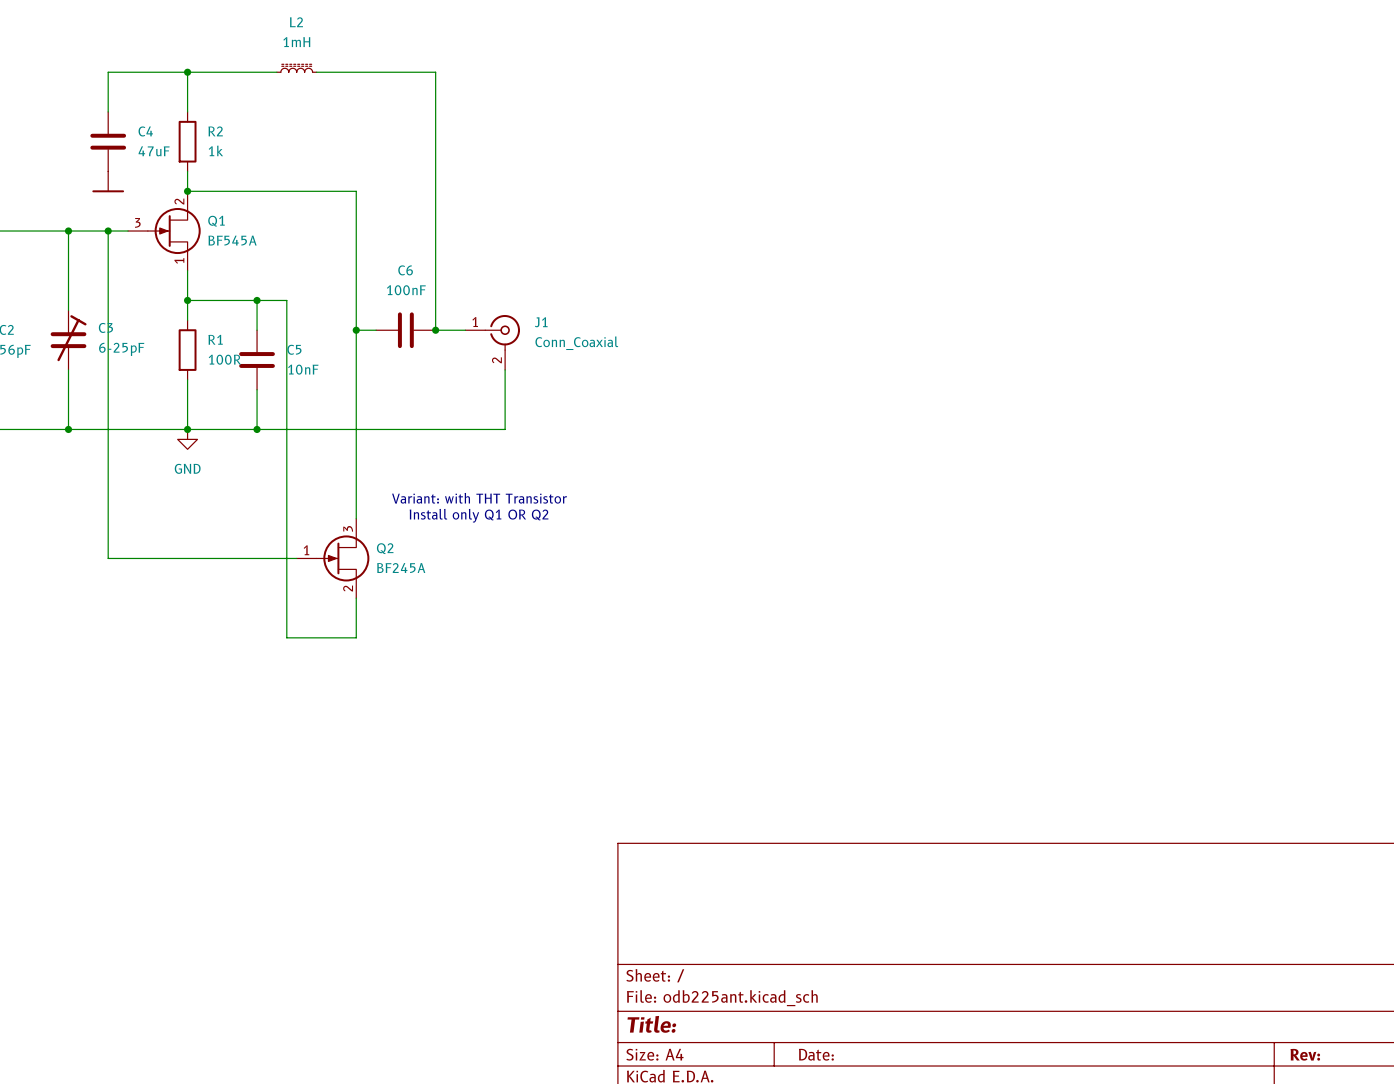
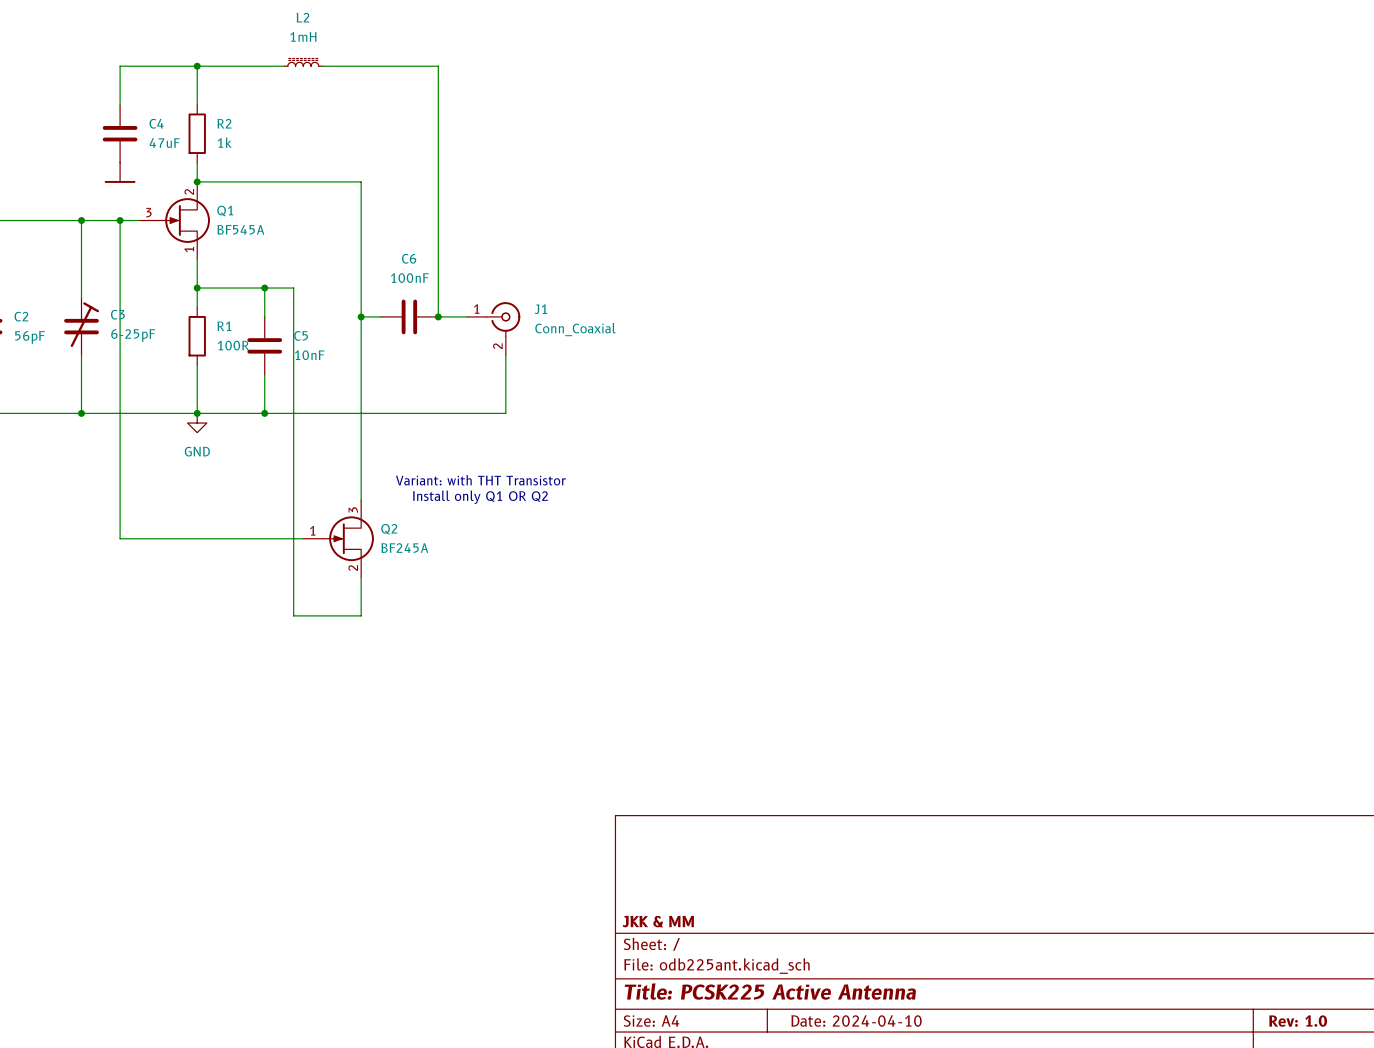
title block: none -> JKK & MM (658, 921)
title block: Title: (651, 1024) -> Title: PCSK225 Active Antenna (770, 991)
title block: Date: (816, 1054) -> Date: 2024-04-10 (856, 1021)
title block: Rev: (1305, 1054) -> Rev: 1.0 (1298, 1021)

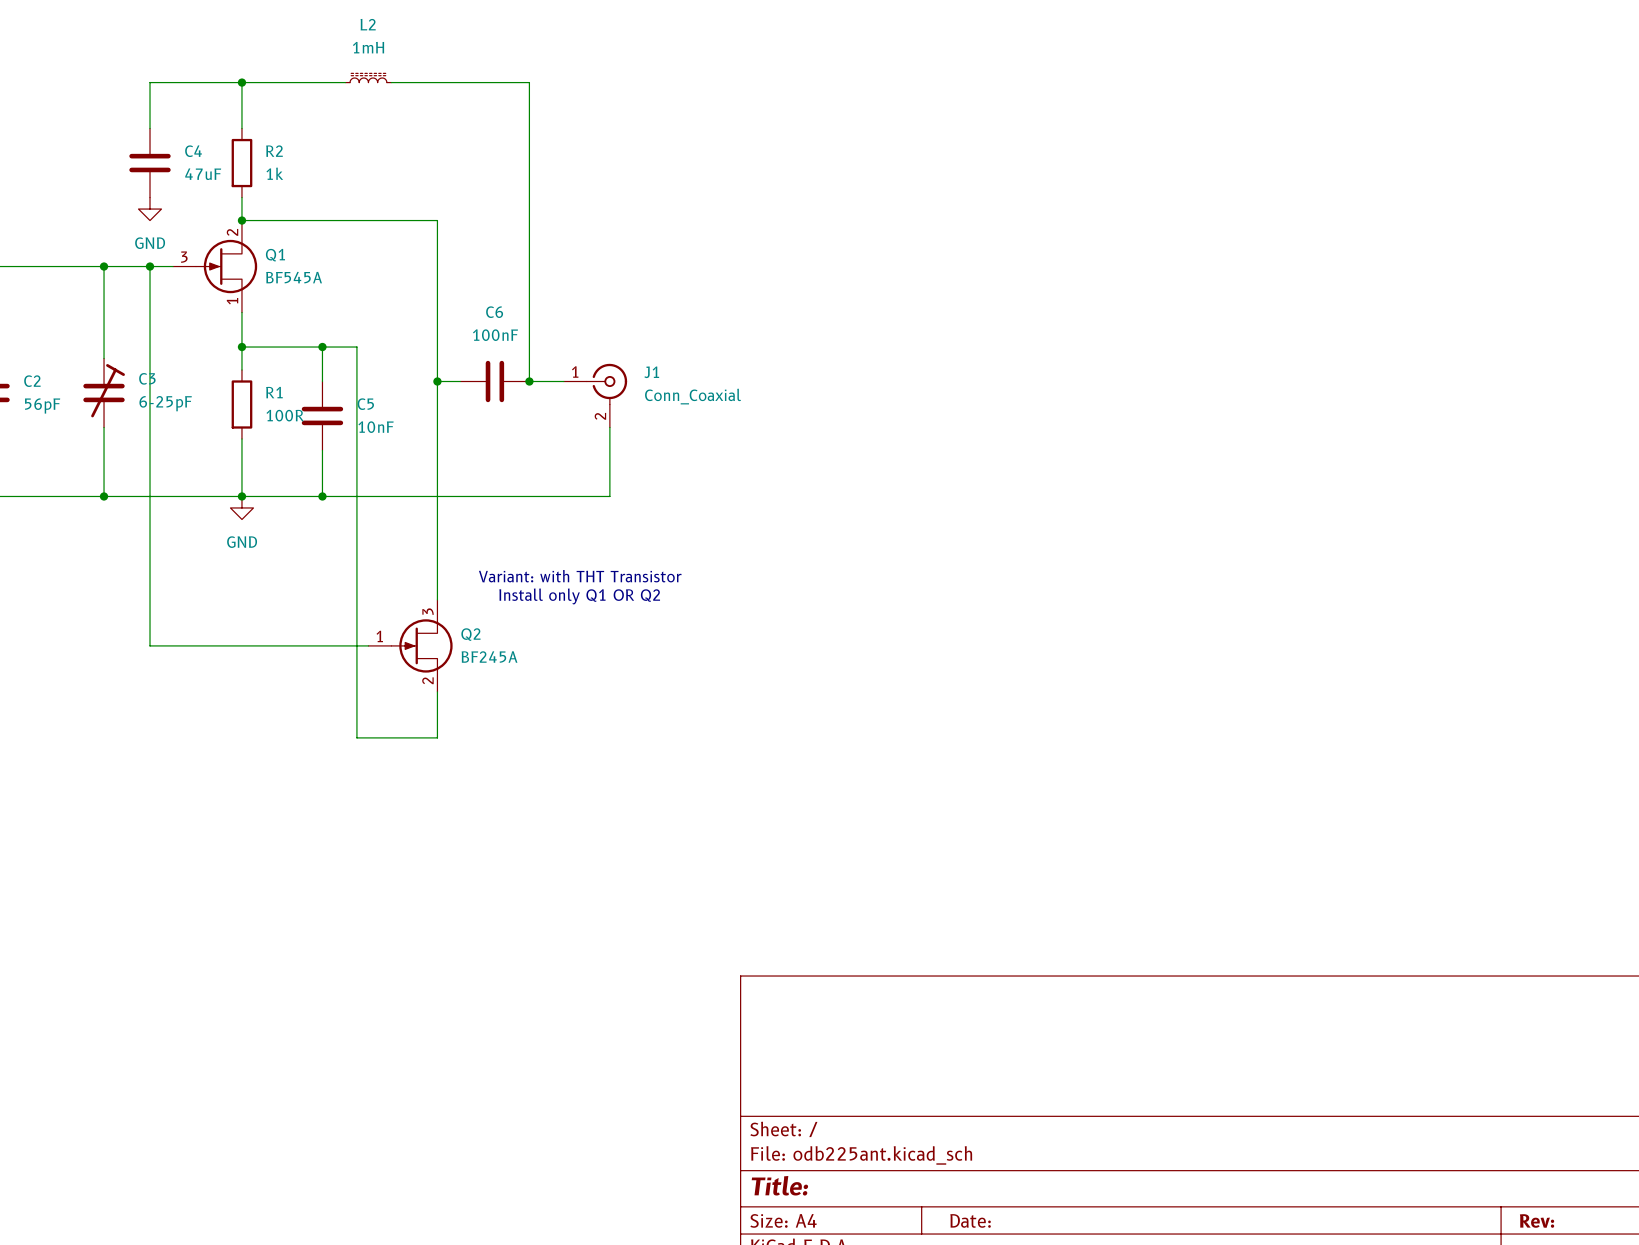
power symbol shape: [104, 162, 136, 183] -> [138, 197, 162, 221]
power symbol text: none -> GND (150, 243)
title block: JKK & MM (658, 921) -> none
title block: Title: PCSK225 Active Antenna (770, 991) -> Title: (779, 1185)
title block: Date: 2024-04-10 (856, 1021) -> Date: (970, 1220)
title block: Rev: 1.0 (1298, 1021) -> Rev: (1537, 1221)

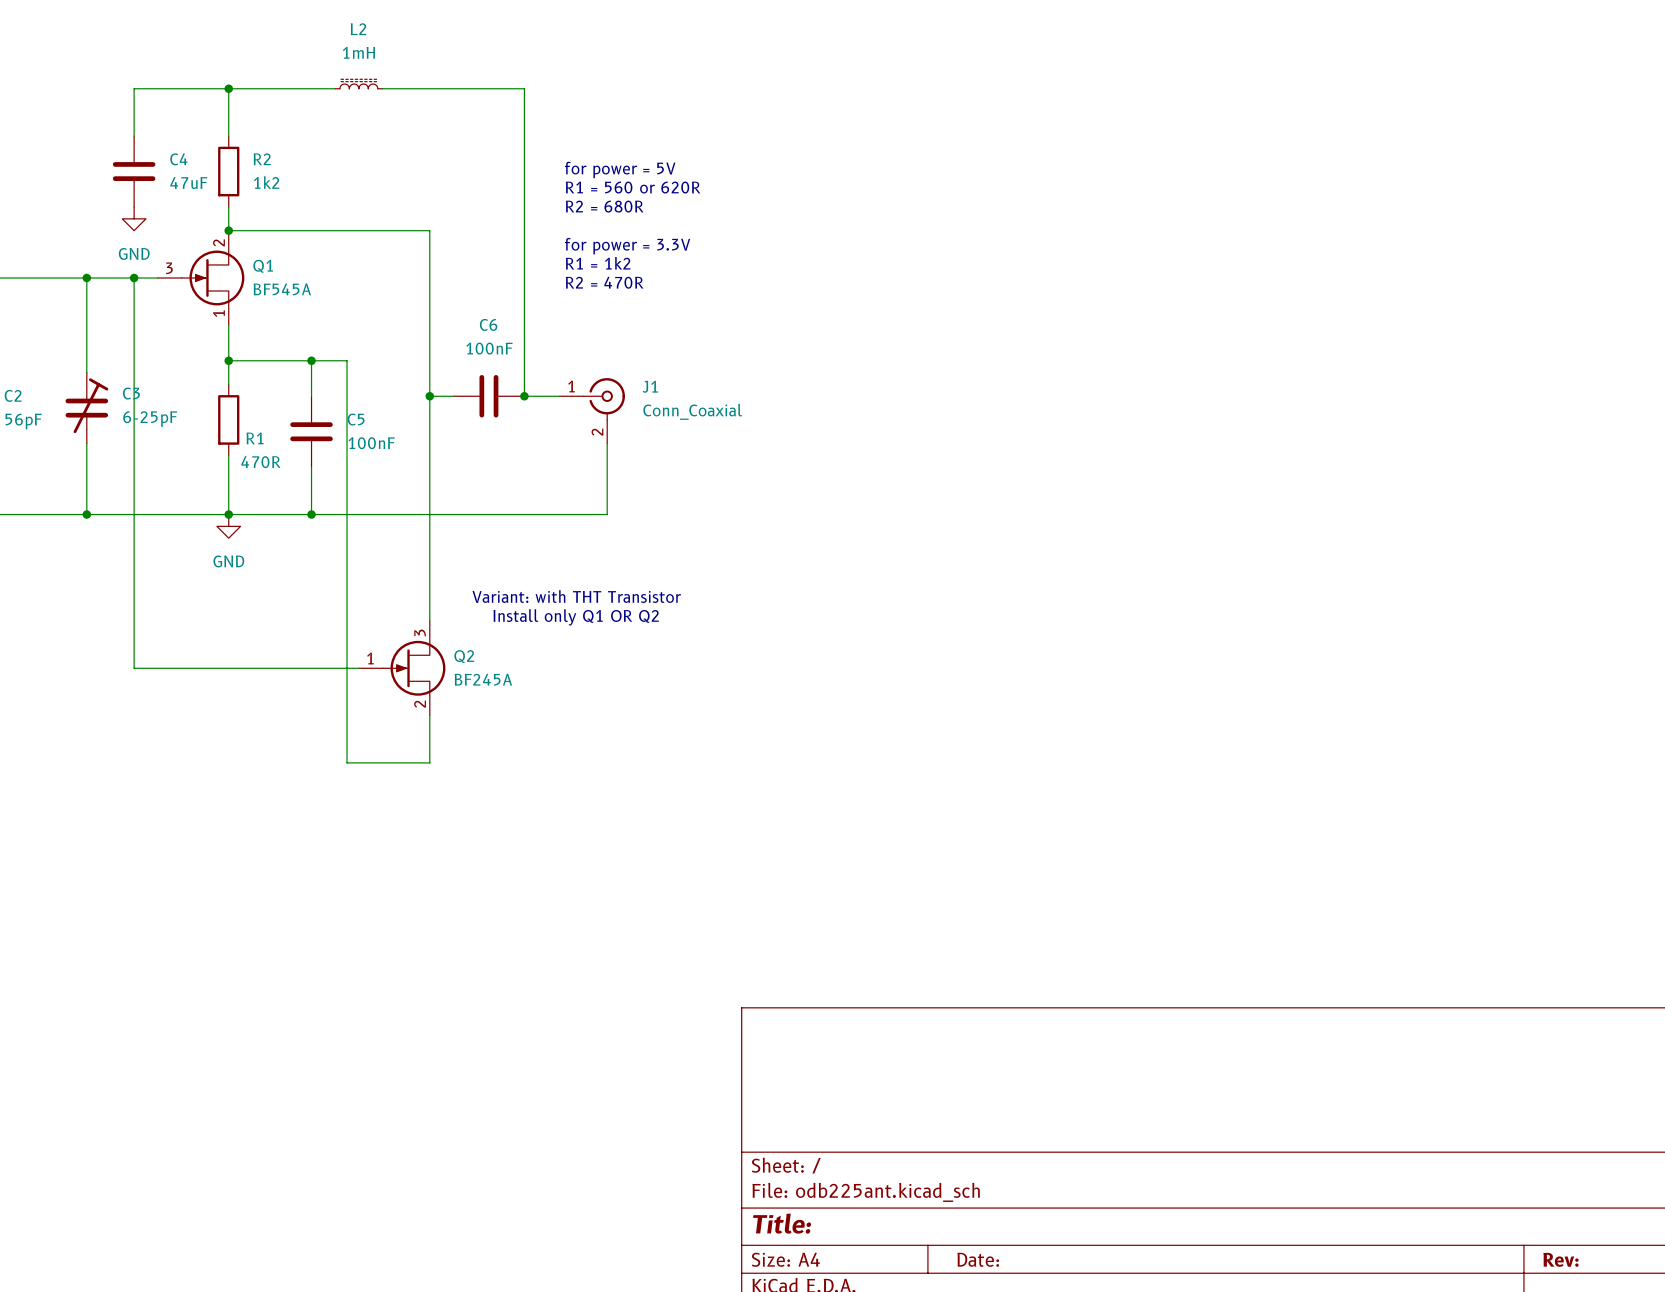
text: none -> for power = 5V (620, 169)
R2 value: 1k (274, 173) -> 1k2 (266, 182)
text: none -> R1 = 560 or 620R (633, 187)
text: none -> R2 = 680R (604, 206)
text: none -> for power = 3.3V (627, 246)
text: none -> R1 = 1k2 (598, 263)
text: none -> R2 = 470R (604, 282)
R1 name position: R1 (274, 392) -> R1 (255, 438)
R1 value: 100R (285, 415) -> 470R (260, 462)
C5 value: 10nF (376, 427) -> 100nF (371, 443)

